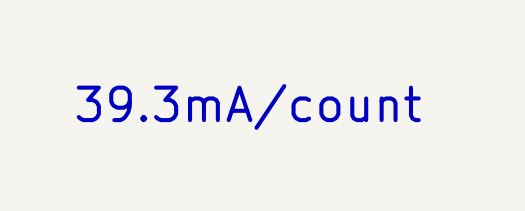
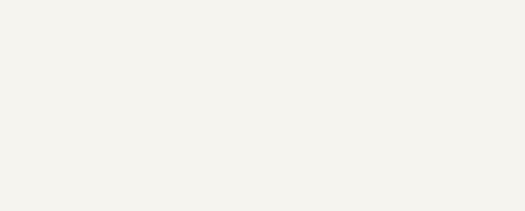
text: 39.3mA/count (248, 106) -> none

